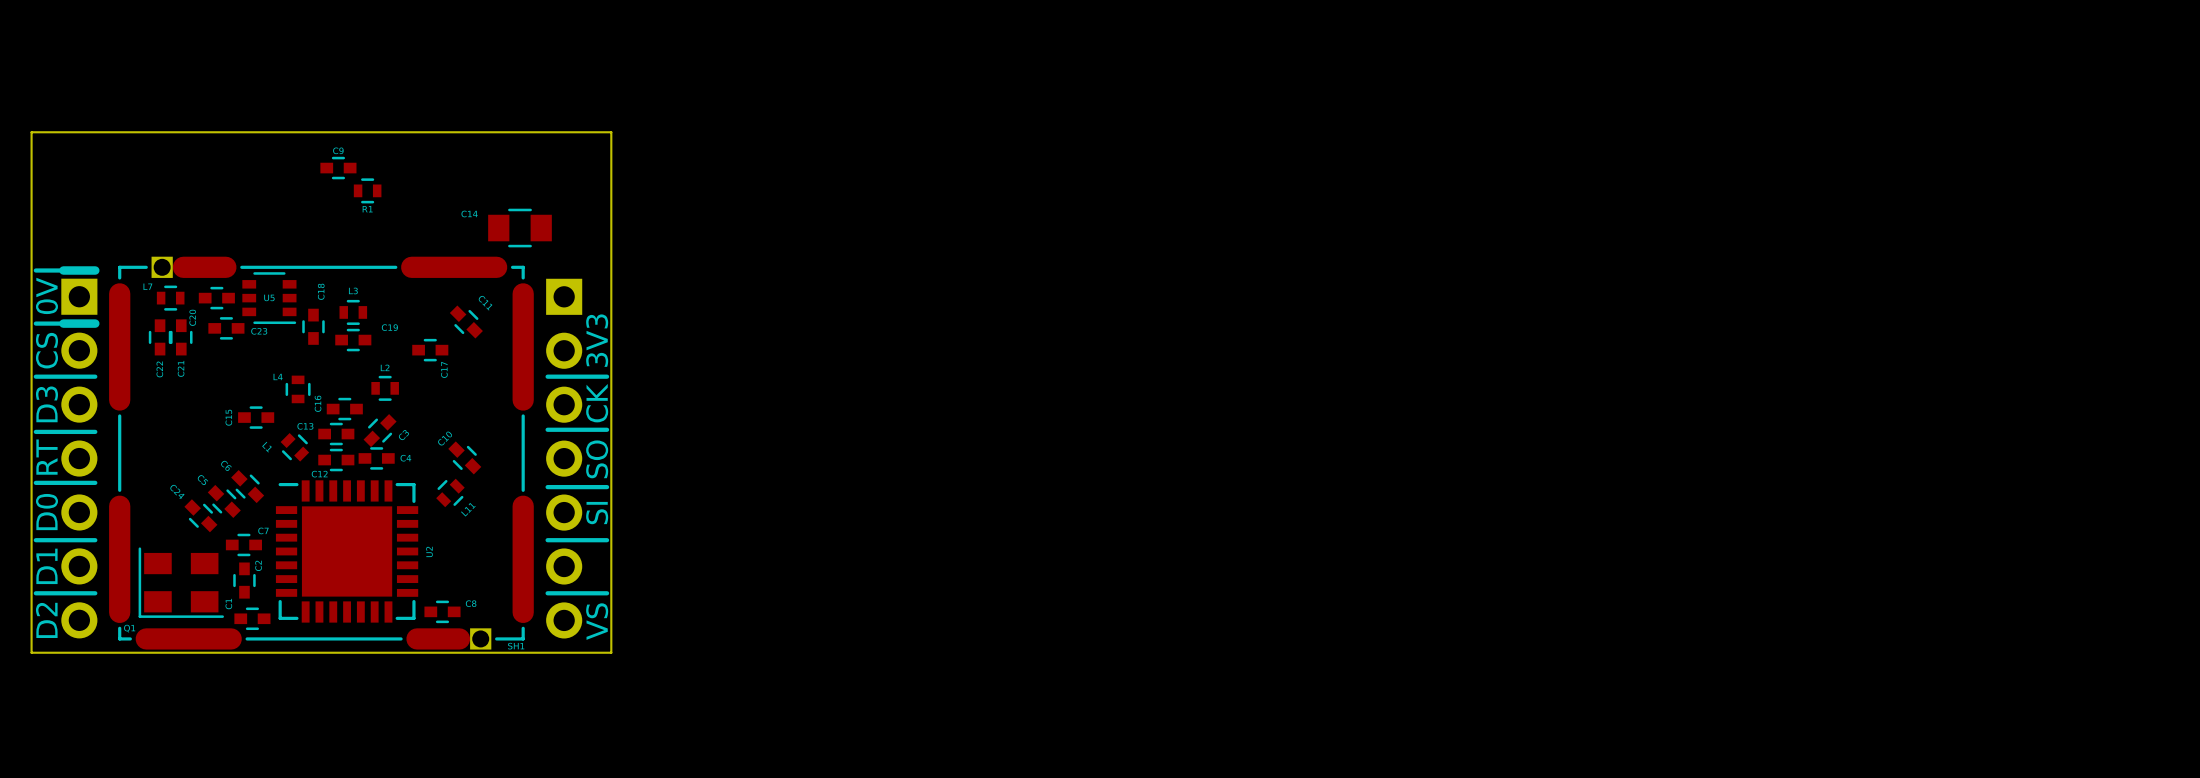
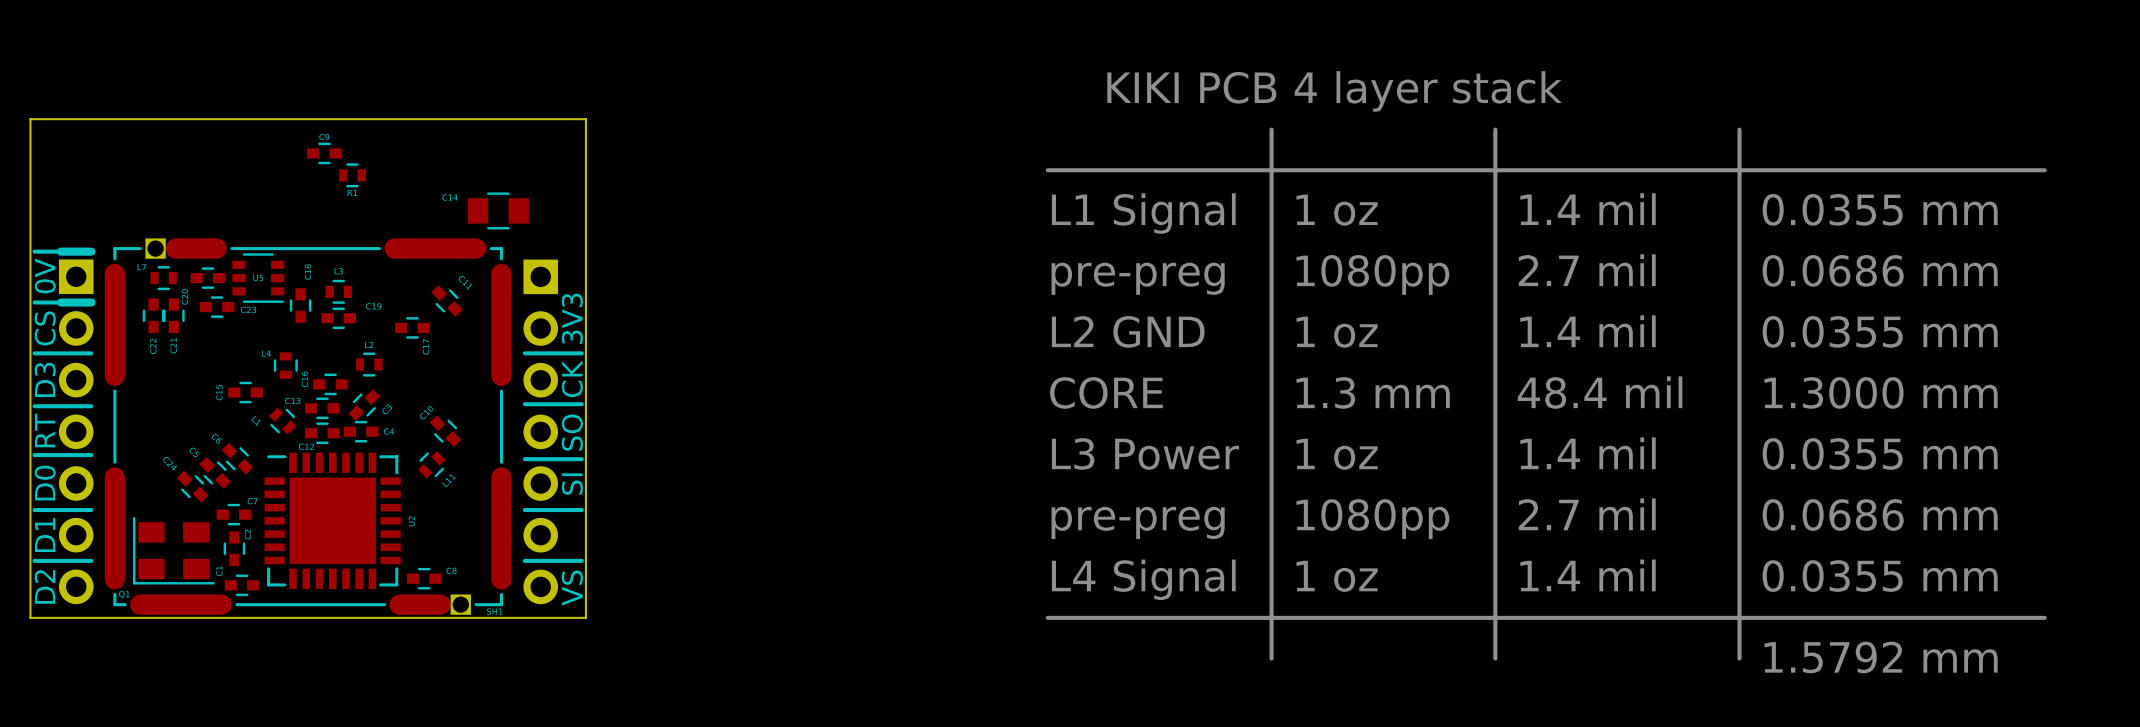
text: none -> KIKI PCB 4 layer stack (1334, 91)
line: none -> (1271, 129) (1271, 658)
line: none -> (1495, 129) (1495, 658)
line: none -> (1739, 129) (1739, 658)
line: none -> (1047, 170) (2044, 170)
text: none -> 1.4 mil (1588, 209)
text: none -> 0.0355 mm (1880, 209)
text: none -> 1 oz (1337, 210)
text: none -> L1 Signal (1143, 213)
text: none -> 2.7 mil (1587, 270)
text: none -> 0.0686 mm (1880, 270)
text: none -> 1080pp (1372, 274)
text: none -> pre-preg (1138, 278)
text: none -> 1.4 mil (1588, 331)
text: none -> L2 GND (1128, 331)
text: none -> 1 oz (1337, 332)
text: none -> 0.0355 mm (1880, 331)
text: none -> CORE (1106, 392)
text: none -> 1.3 mm (1373, 392)
text: none -> 48.4 mil (1600, 392)
text: none -> 1.3000 mm (1881, 392)
text: none -> L3 Power (1145, 453)
text: none -> 1 oz (1337, 454)
text: none -> 1.4 mil (1588, 453)
text: none -> 0.0355 mm (1880, 453)
text: none -> 2.7 mil (1587, 514)
text: none -> 0.0686 mm (1880, 515)
text: none -> 1080pp (1372, 519)
text: none -> pre-preg (1138, 522)
text: none -> 1.4 mil (1588, 575)
text: none -> 1 oz (1337, 576)
text: none -> 0.0355 mm (1880, 576)
text: none -> L4 Signal (1143, 579)
line: none -> (1047, 617) (2044, 617)
text: none -> 1.5792 mm (1881, 657)

